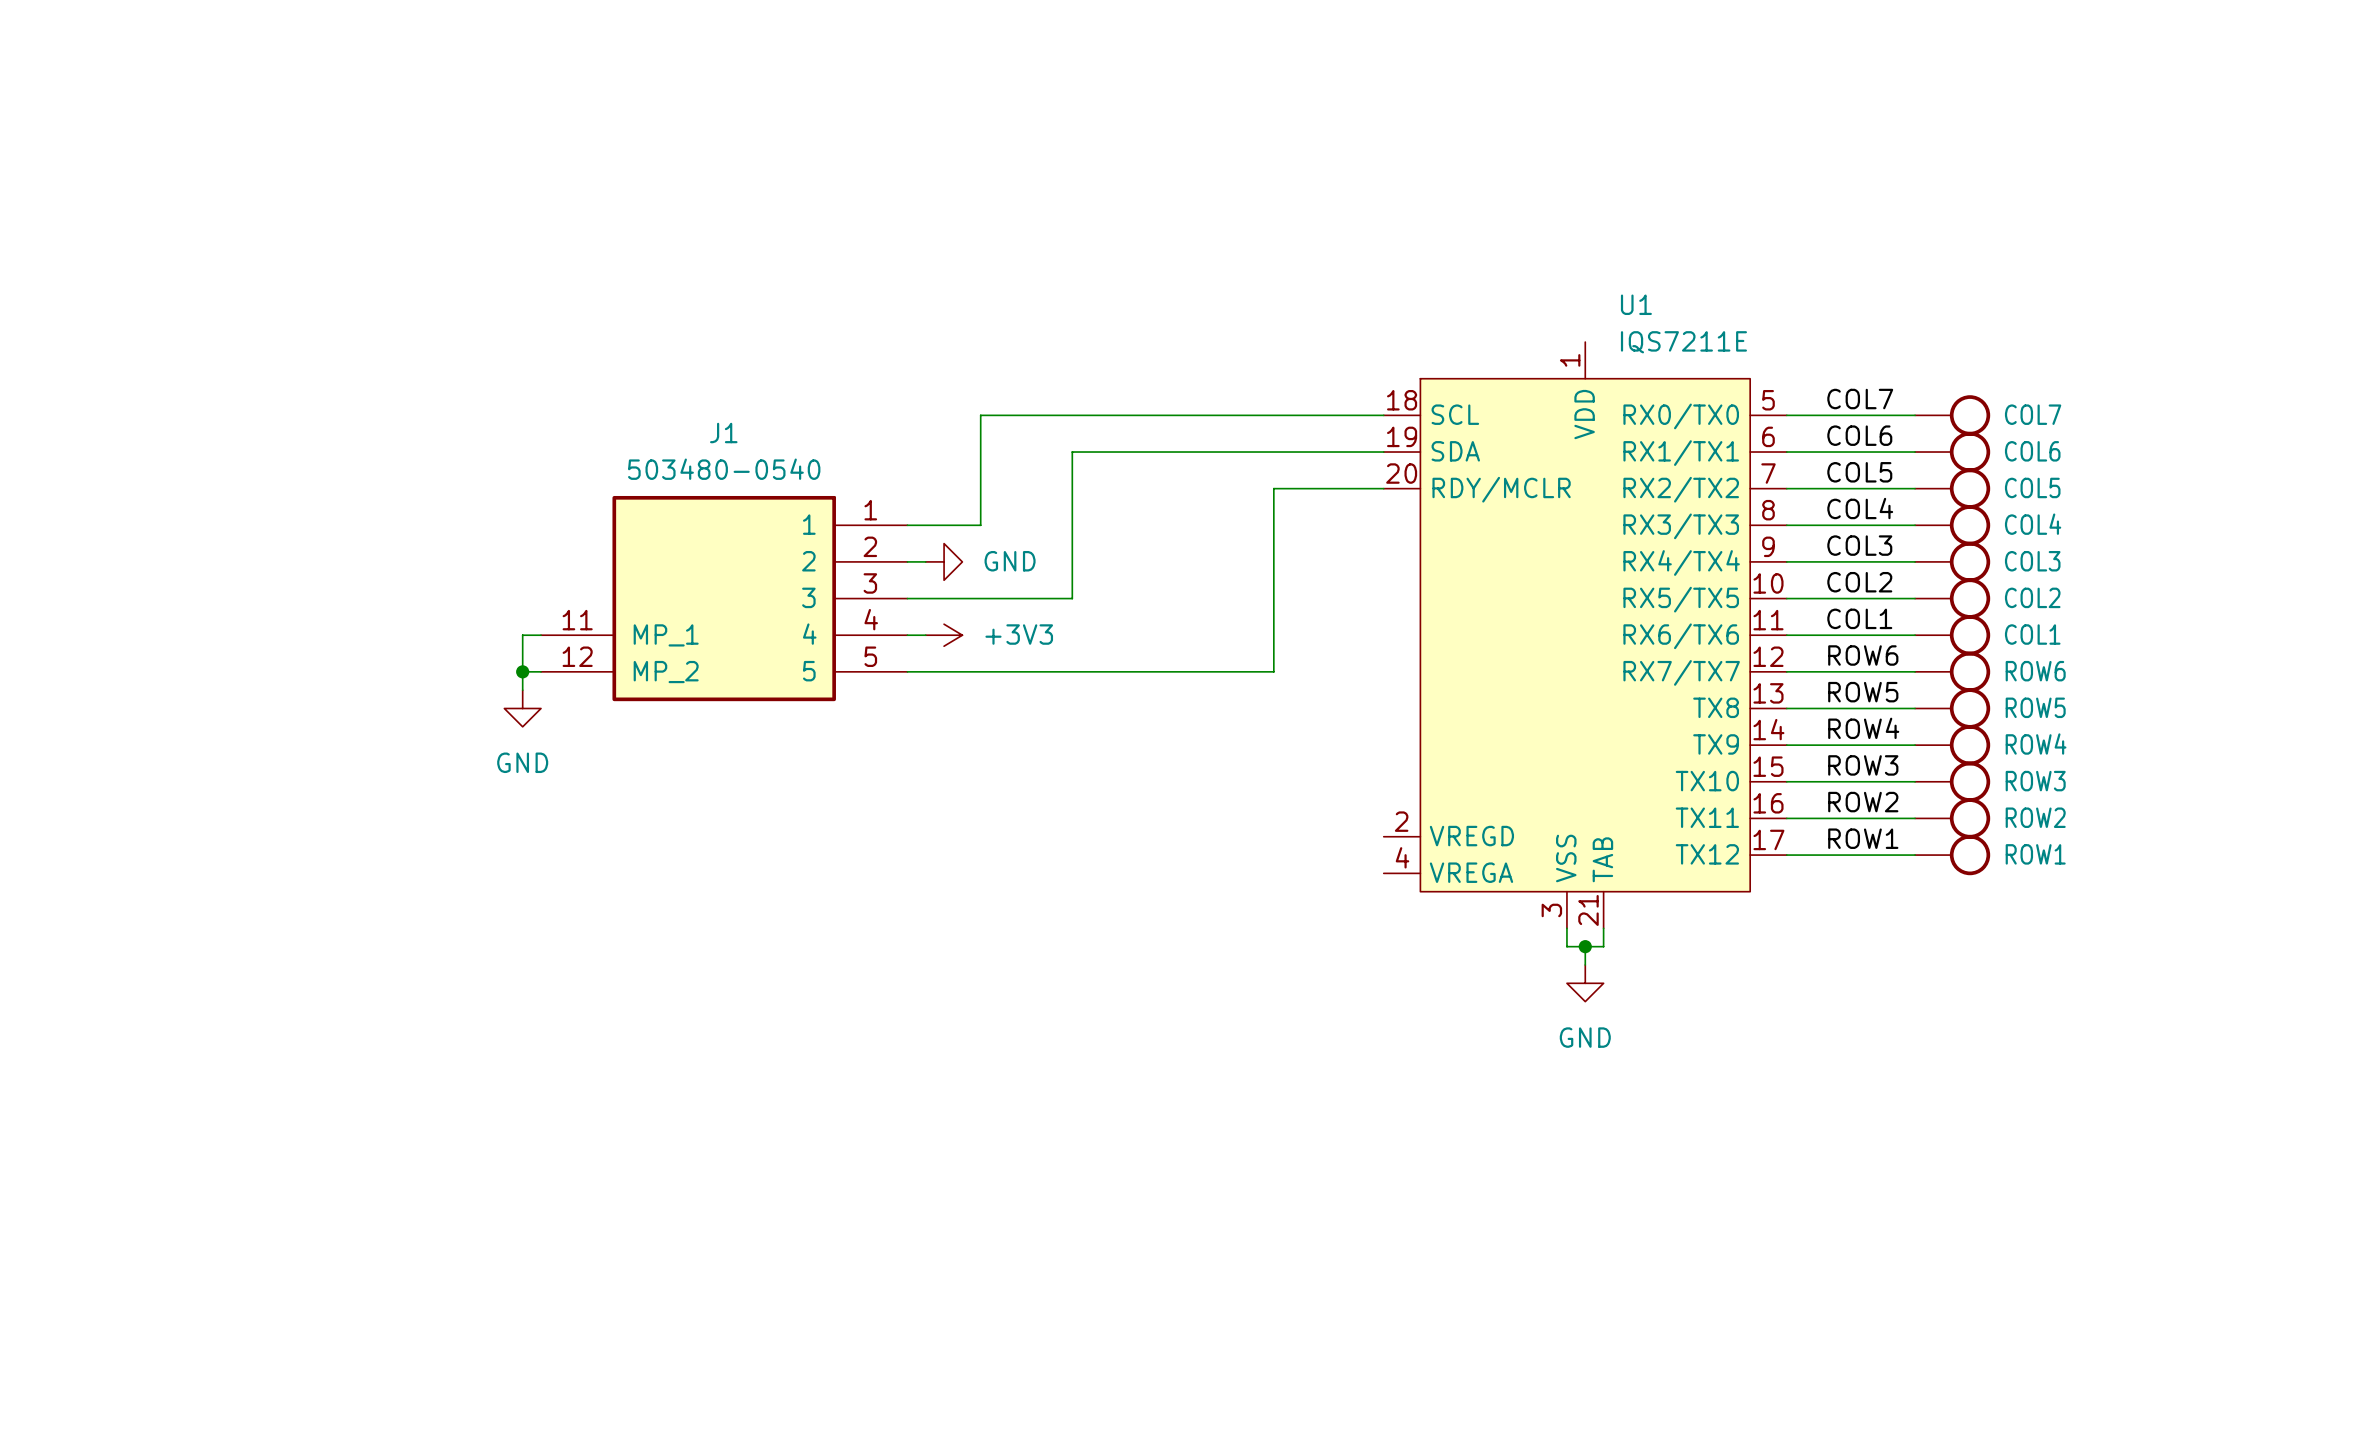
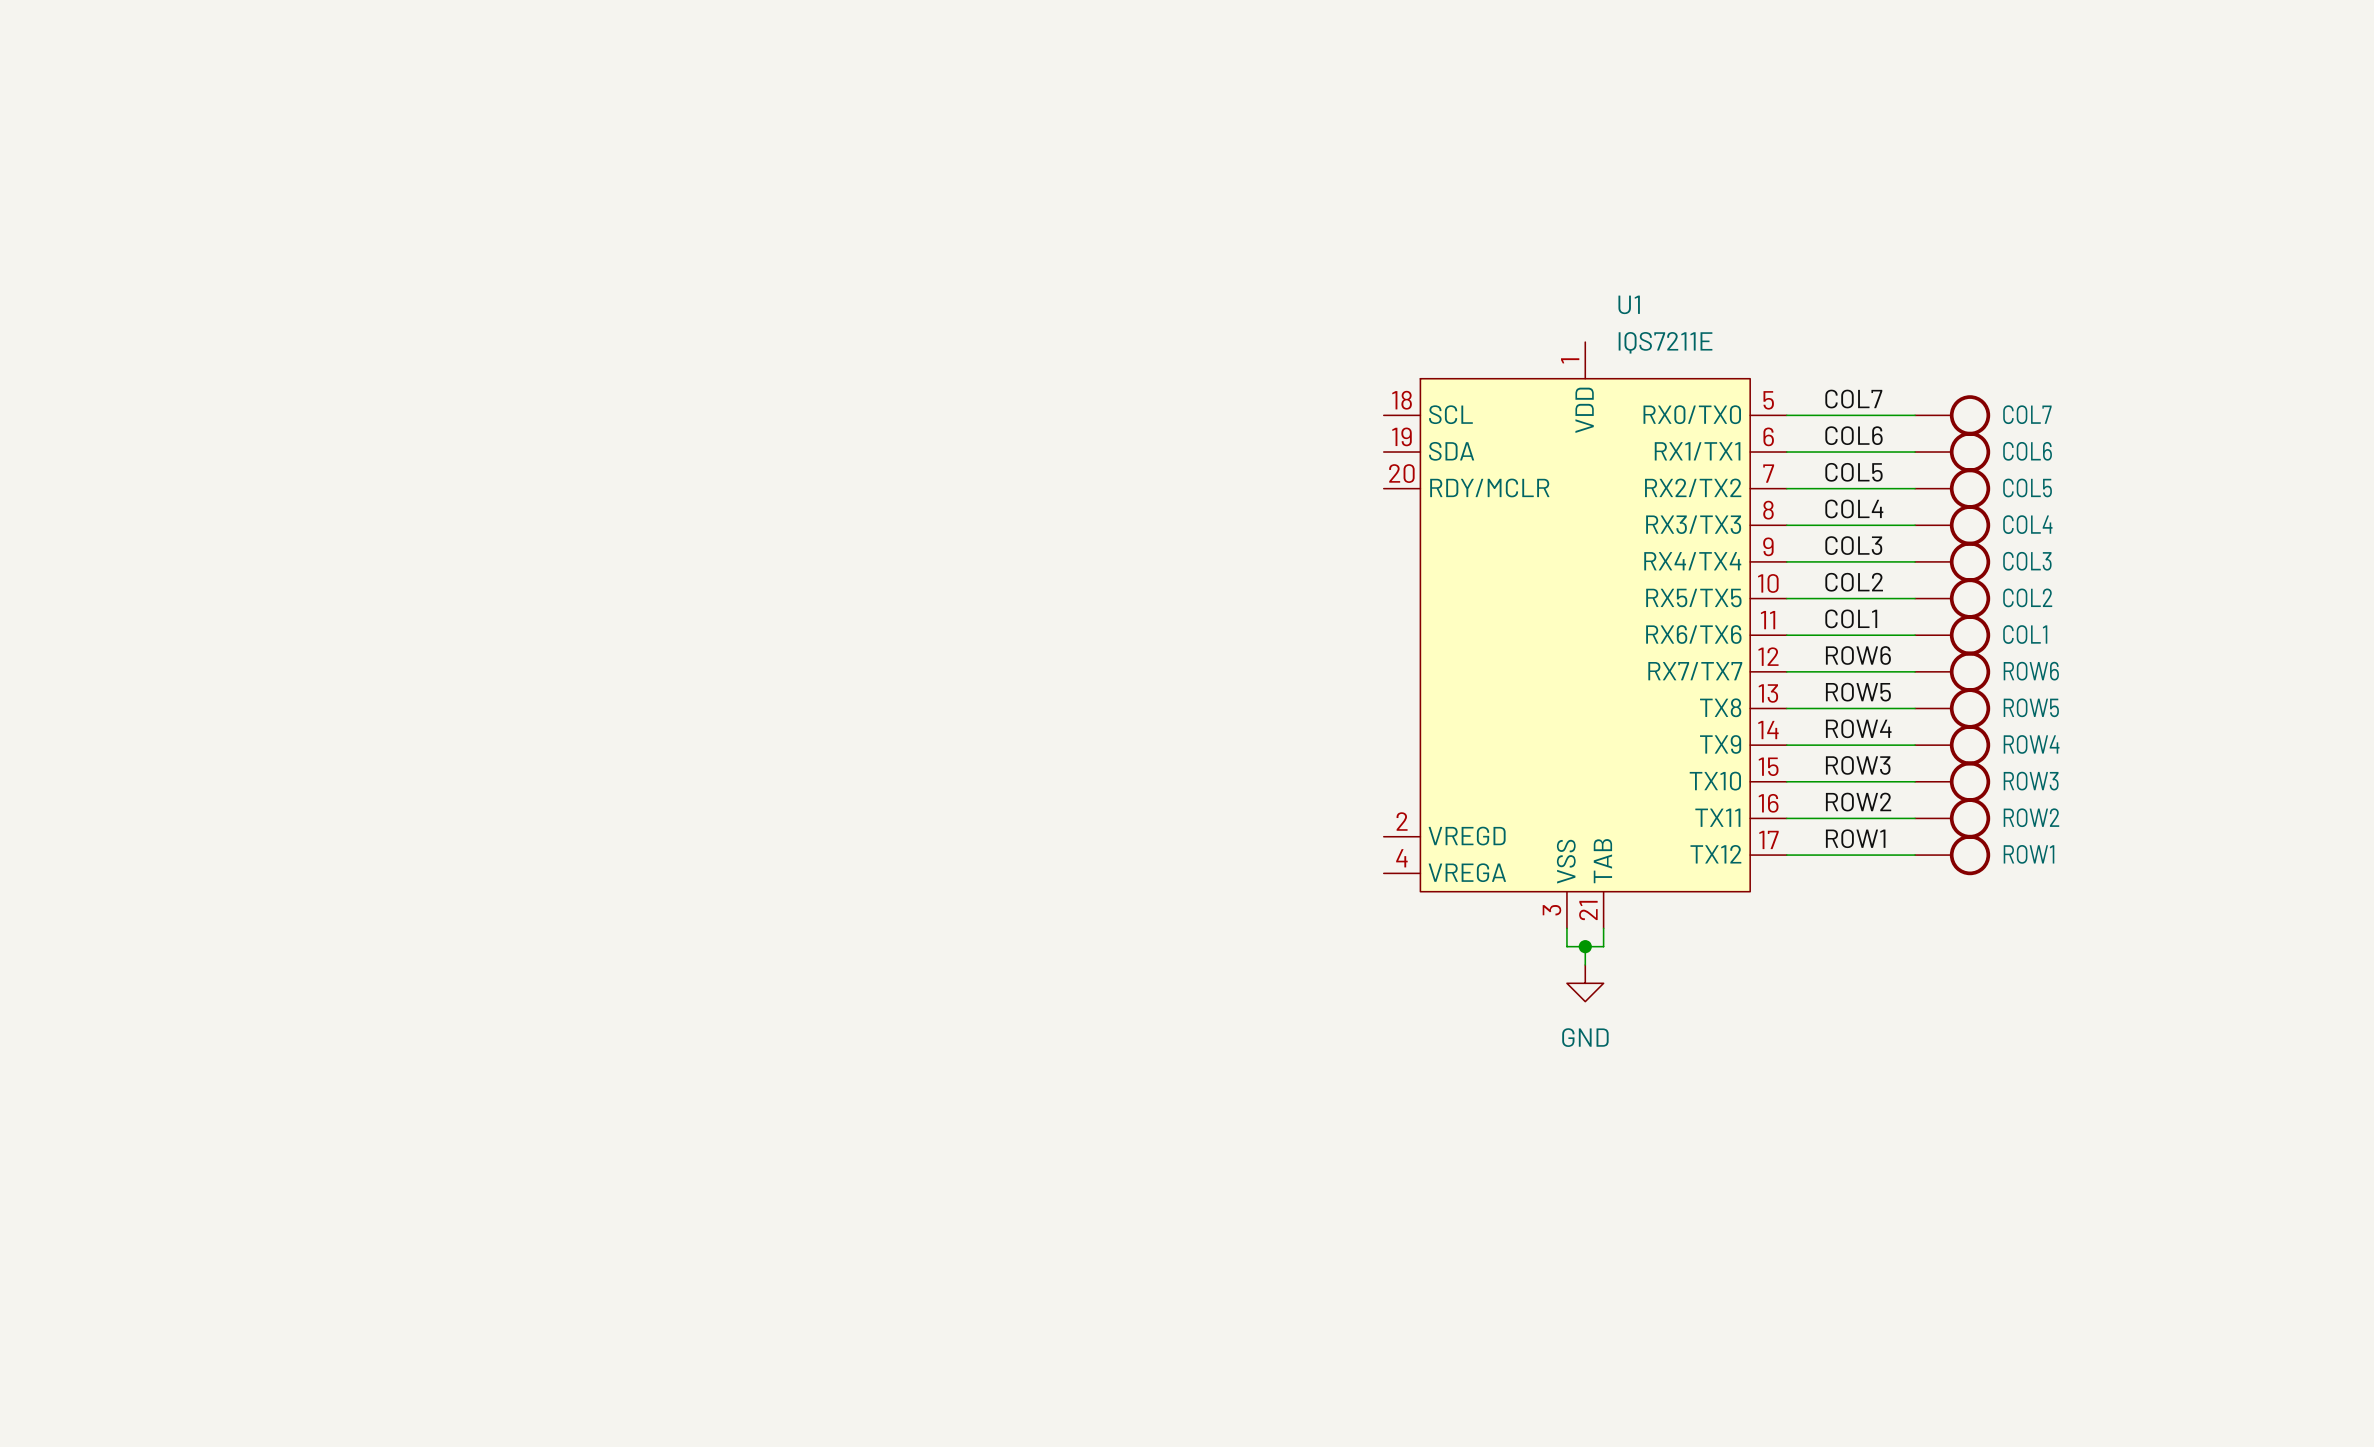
wire: (1383, 415) (980, 415) (980, 525) (907, 525) -> none
wire: (1383, 452) (1072, 452) (1072, 598) (907, 598) -> none
wire: (1383, 488) (1273, 488) (1273, 671) (907, 671) -> none
wire: (907, 561) (925, 561) -> none
power symbol: GND (944, 561) -> none
J1: 503480-0540 (724, 598) -> none
wire: (541, 635) (522, 635) (522, 690) -> none
wire: (907, 635) (925, 635) -> none
power symbol: +3V3 (944, 635) -> none
wire: (522, 671) (541, 671) -> none
junction: (522, 671) -> none
power symbol: GND (522, 708) -> none

